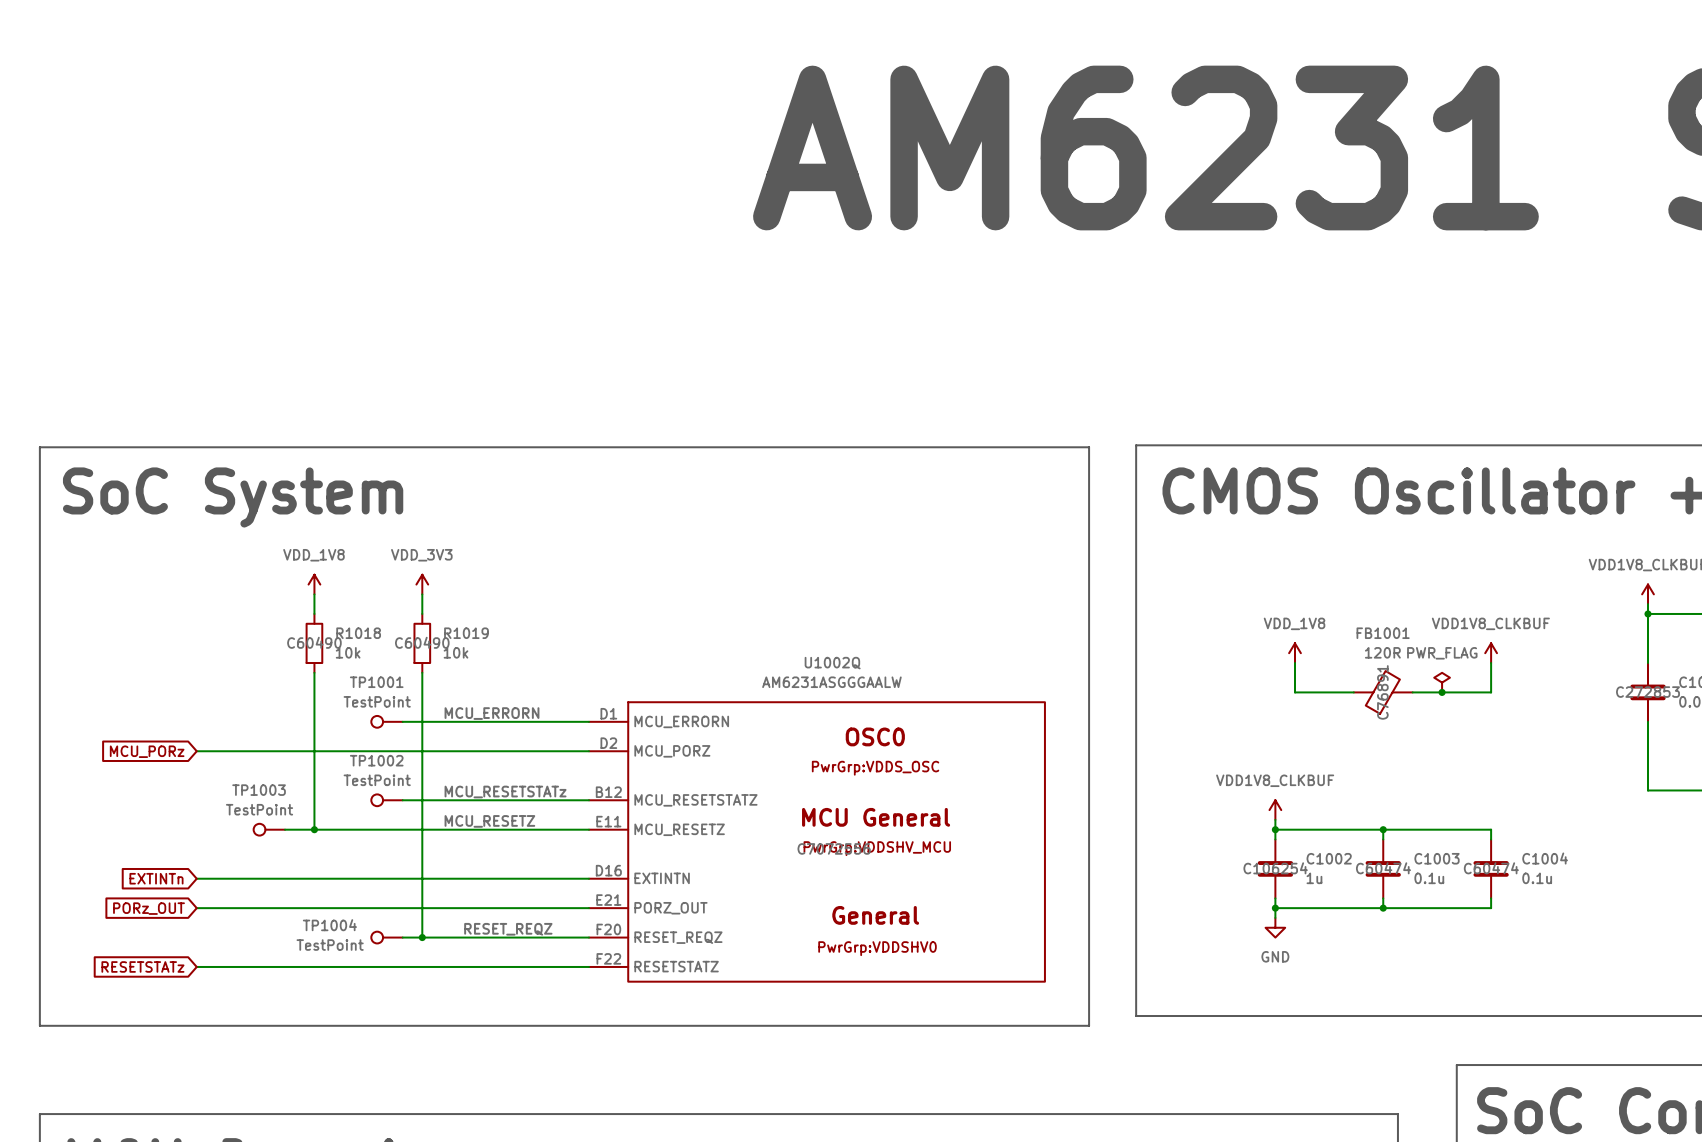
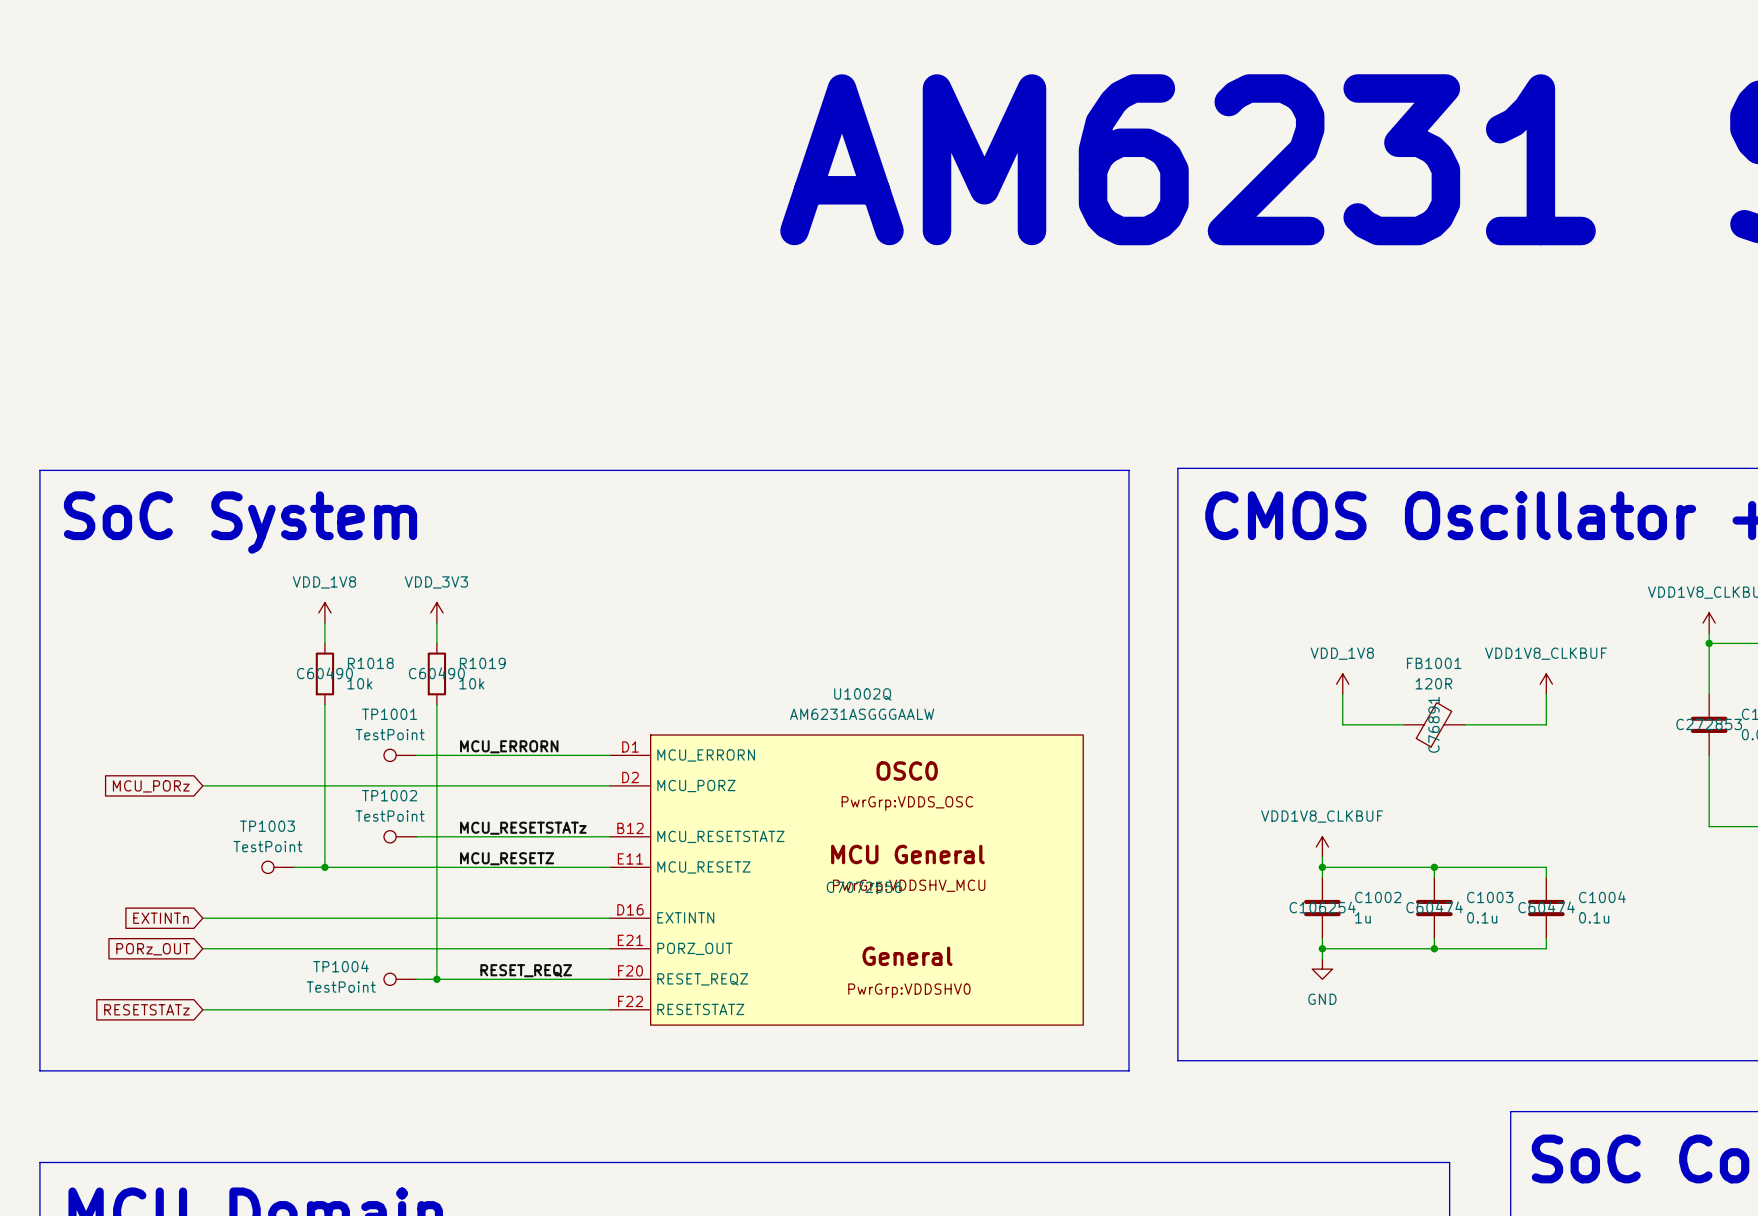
power symbol: PWR_FLAG (1442, 682) -> none
junction: (1442, 692) -> none

